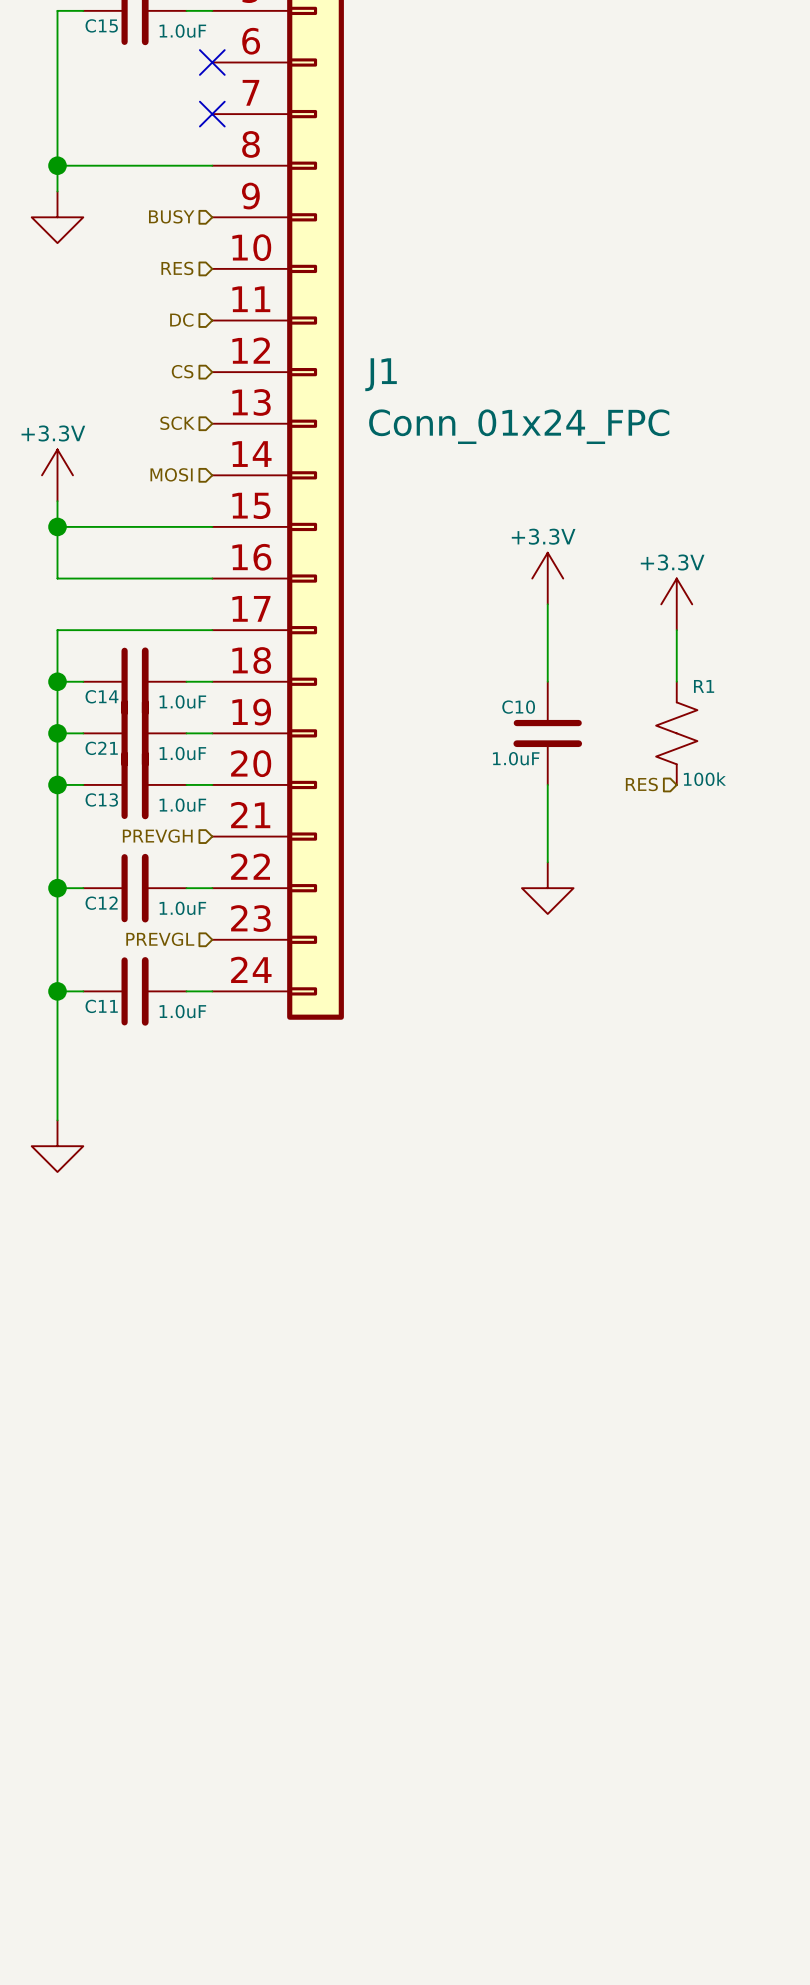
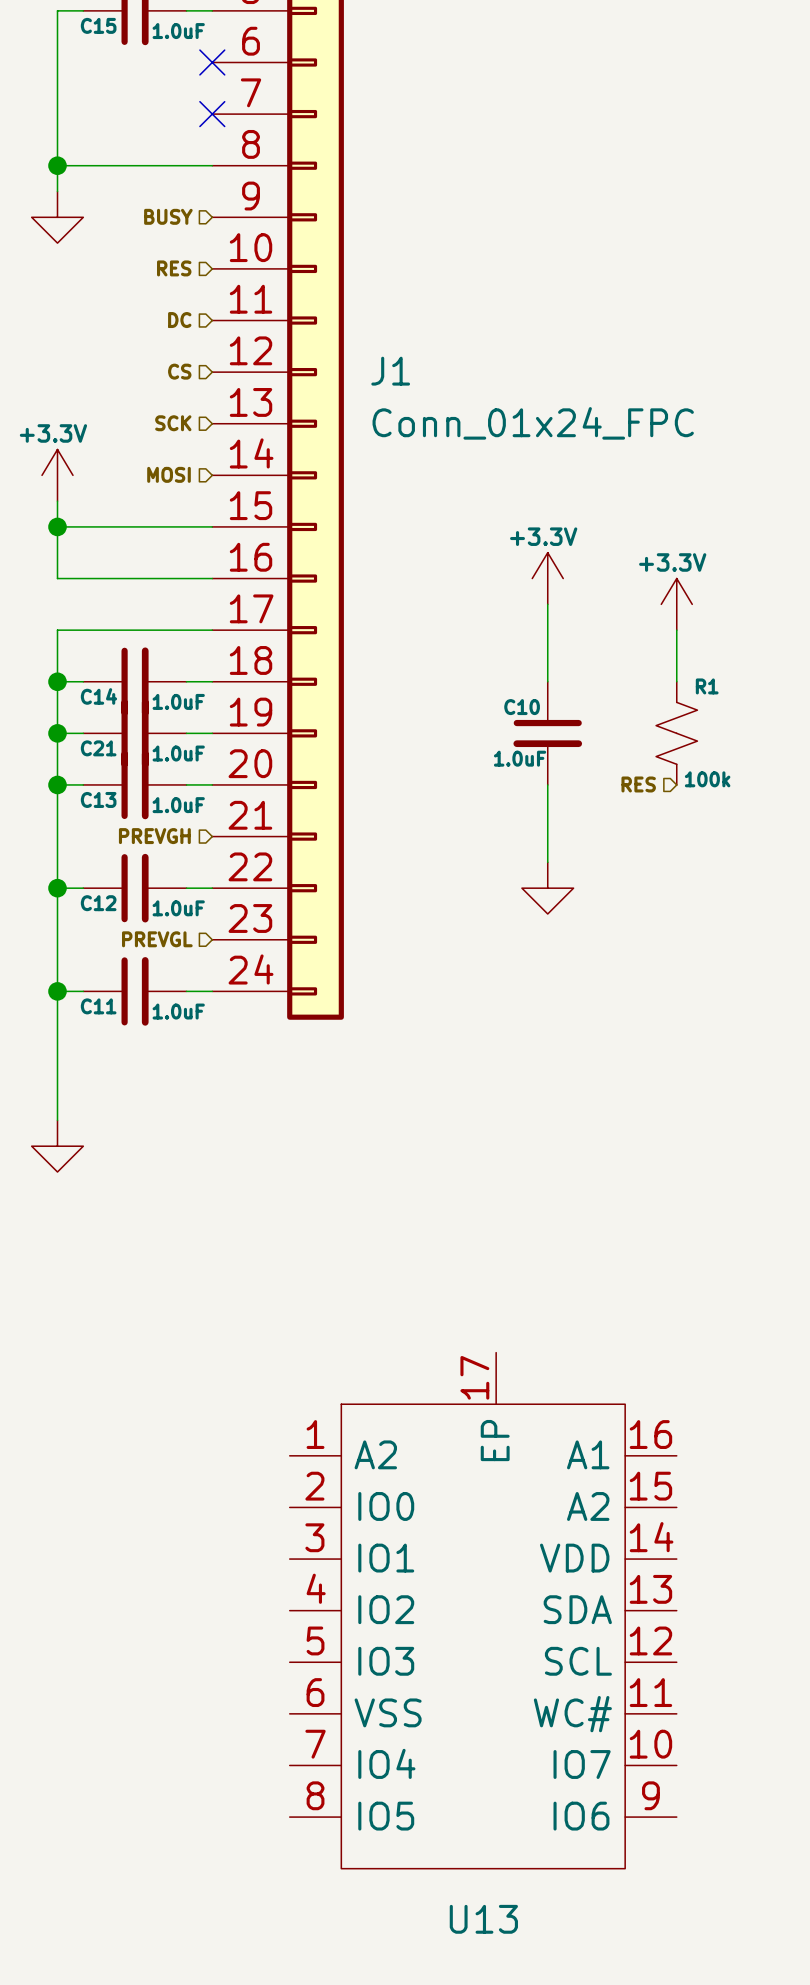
U13: none -> (483, 1610)

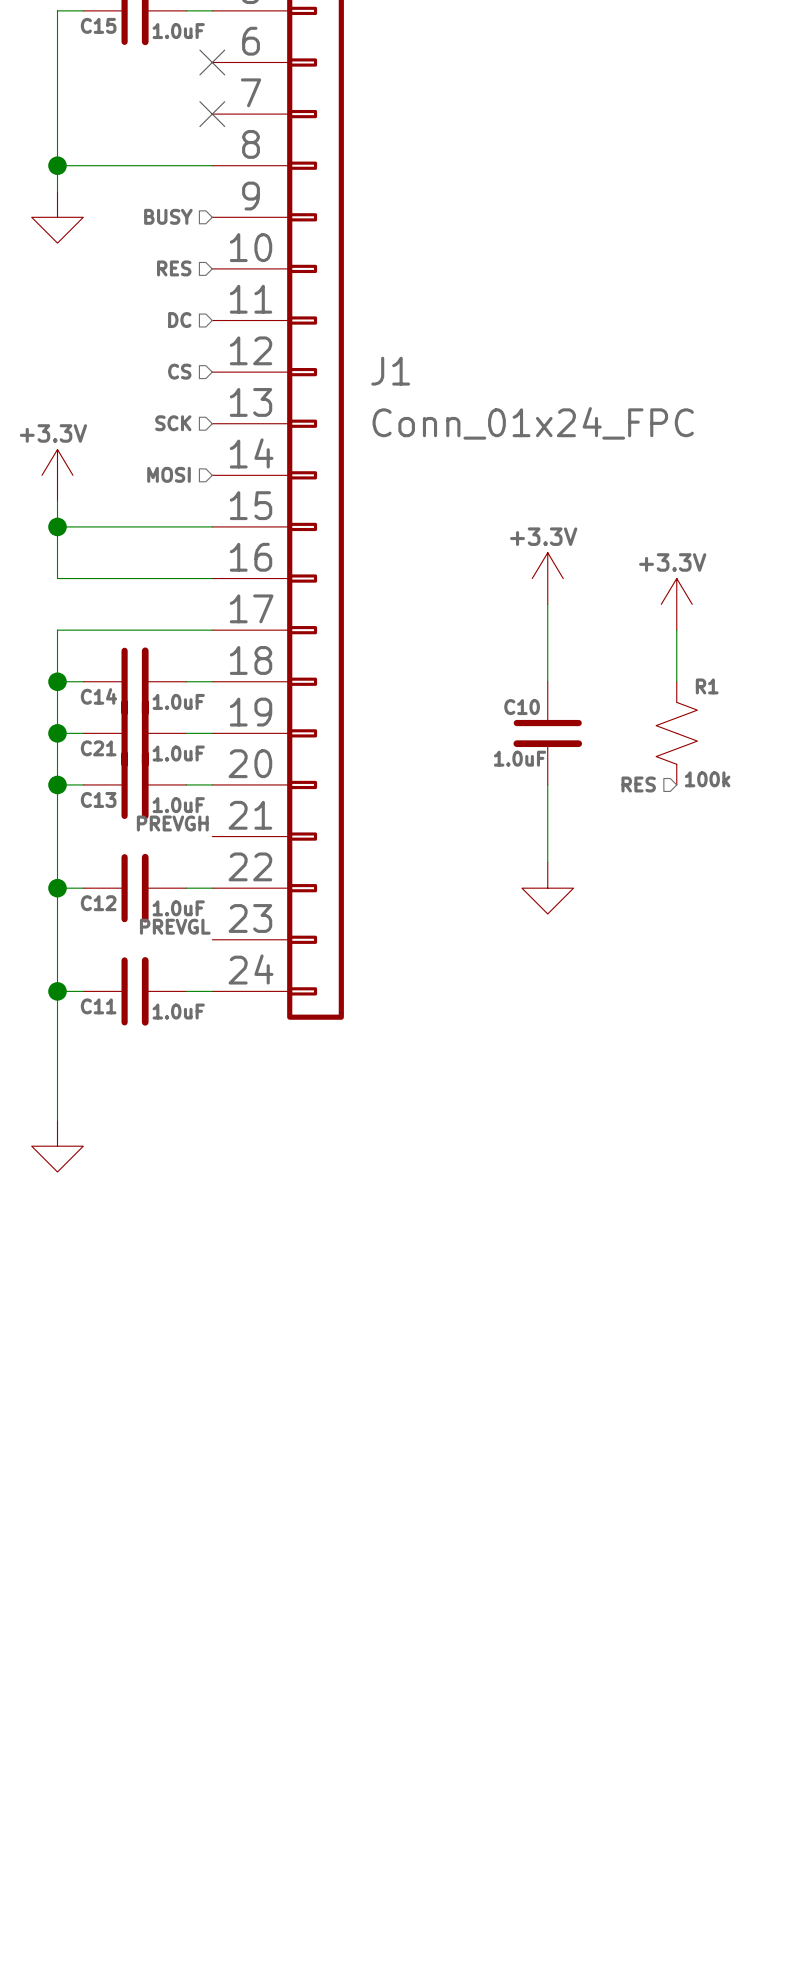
label: none -> PREVGH (172, 823)
hierarchical label: PREVGH (154, 836) -> none
label: none -> PREVGL (175, 926)
hierarchical label: PREVGL (157, 939) -> none
U13: (483, 1610) -> none

